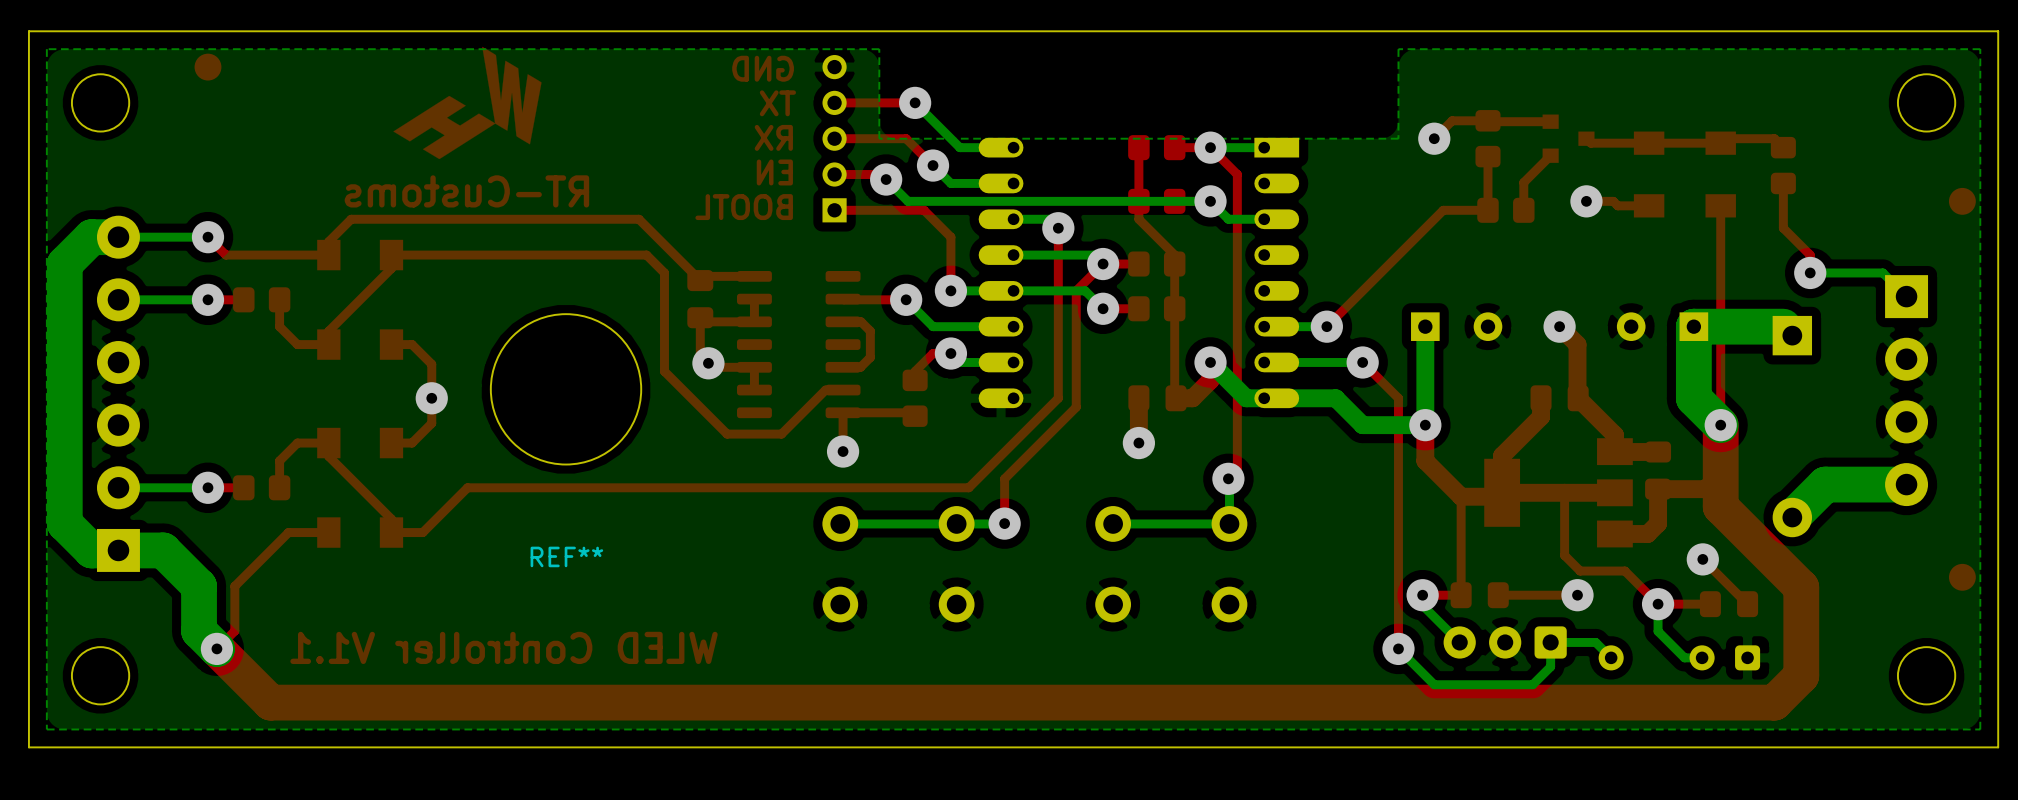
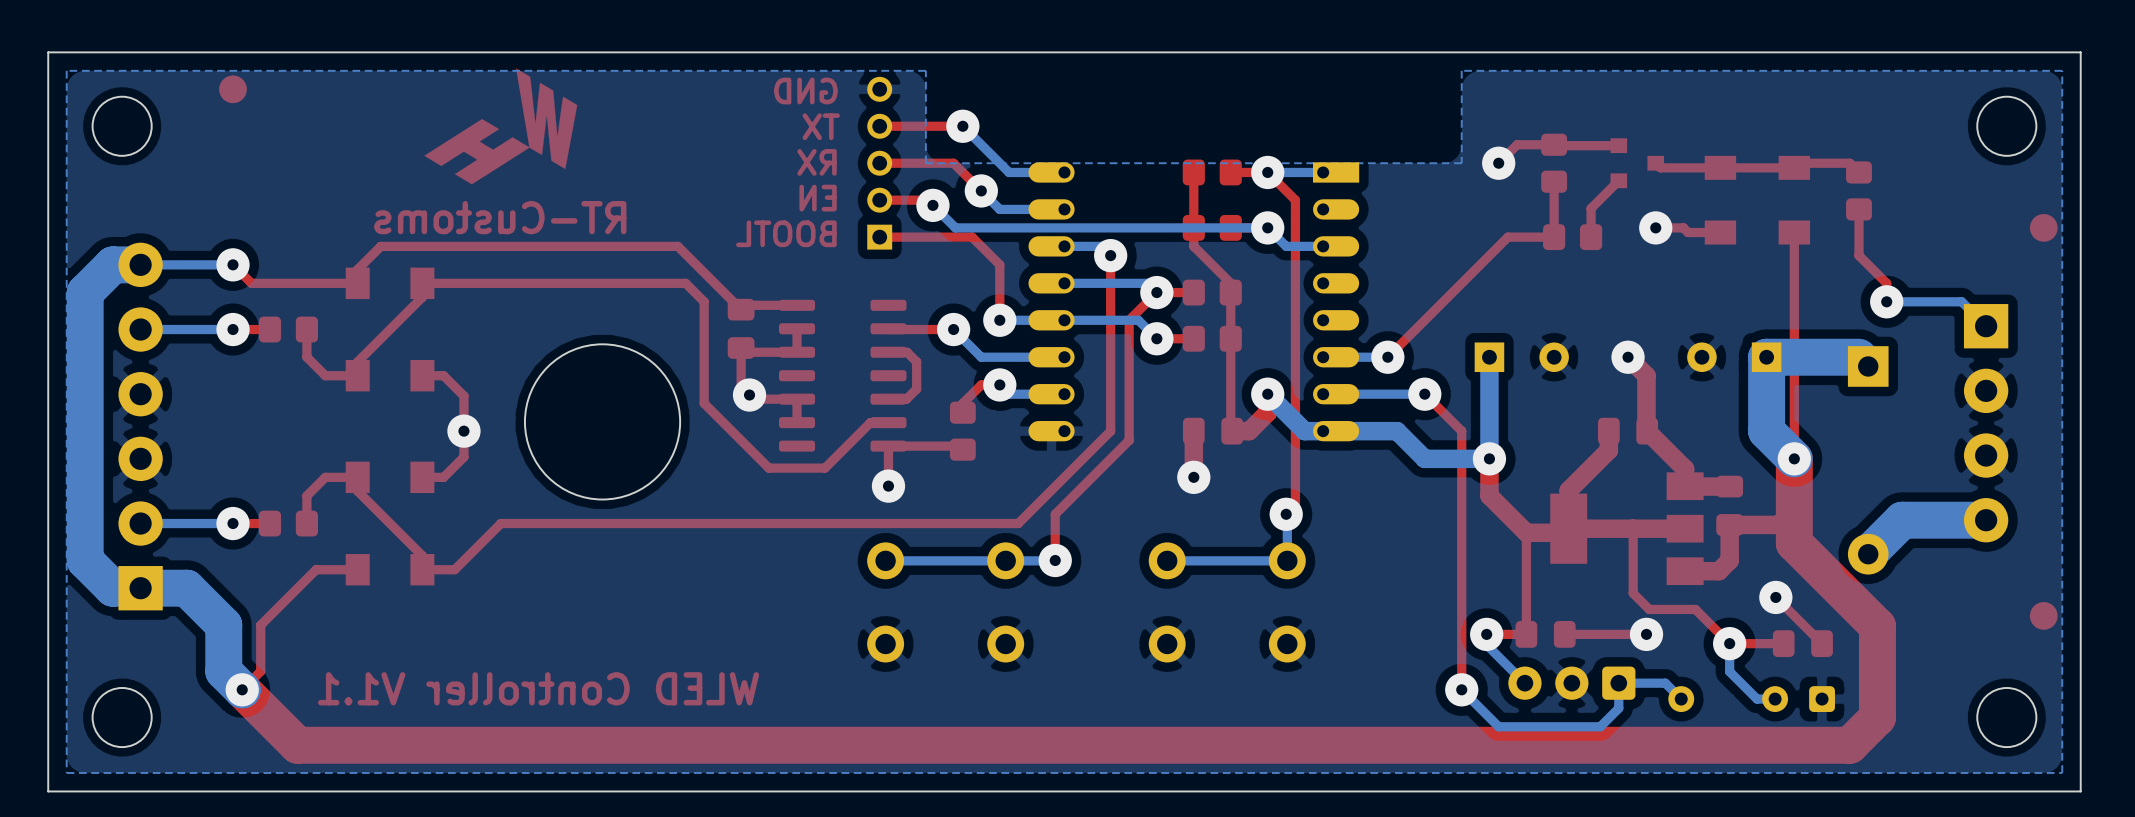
REF** name: REF** (566, 556) -> none

